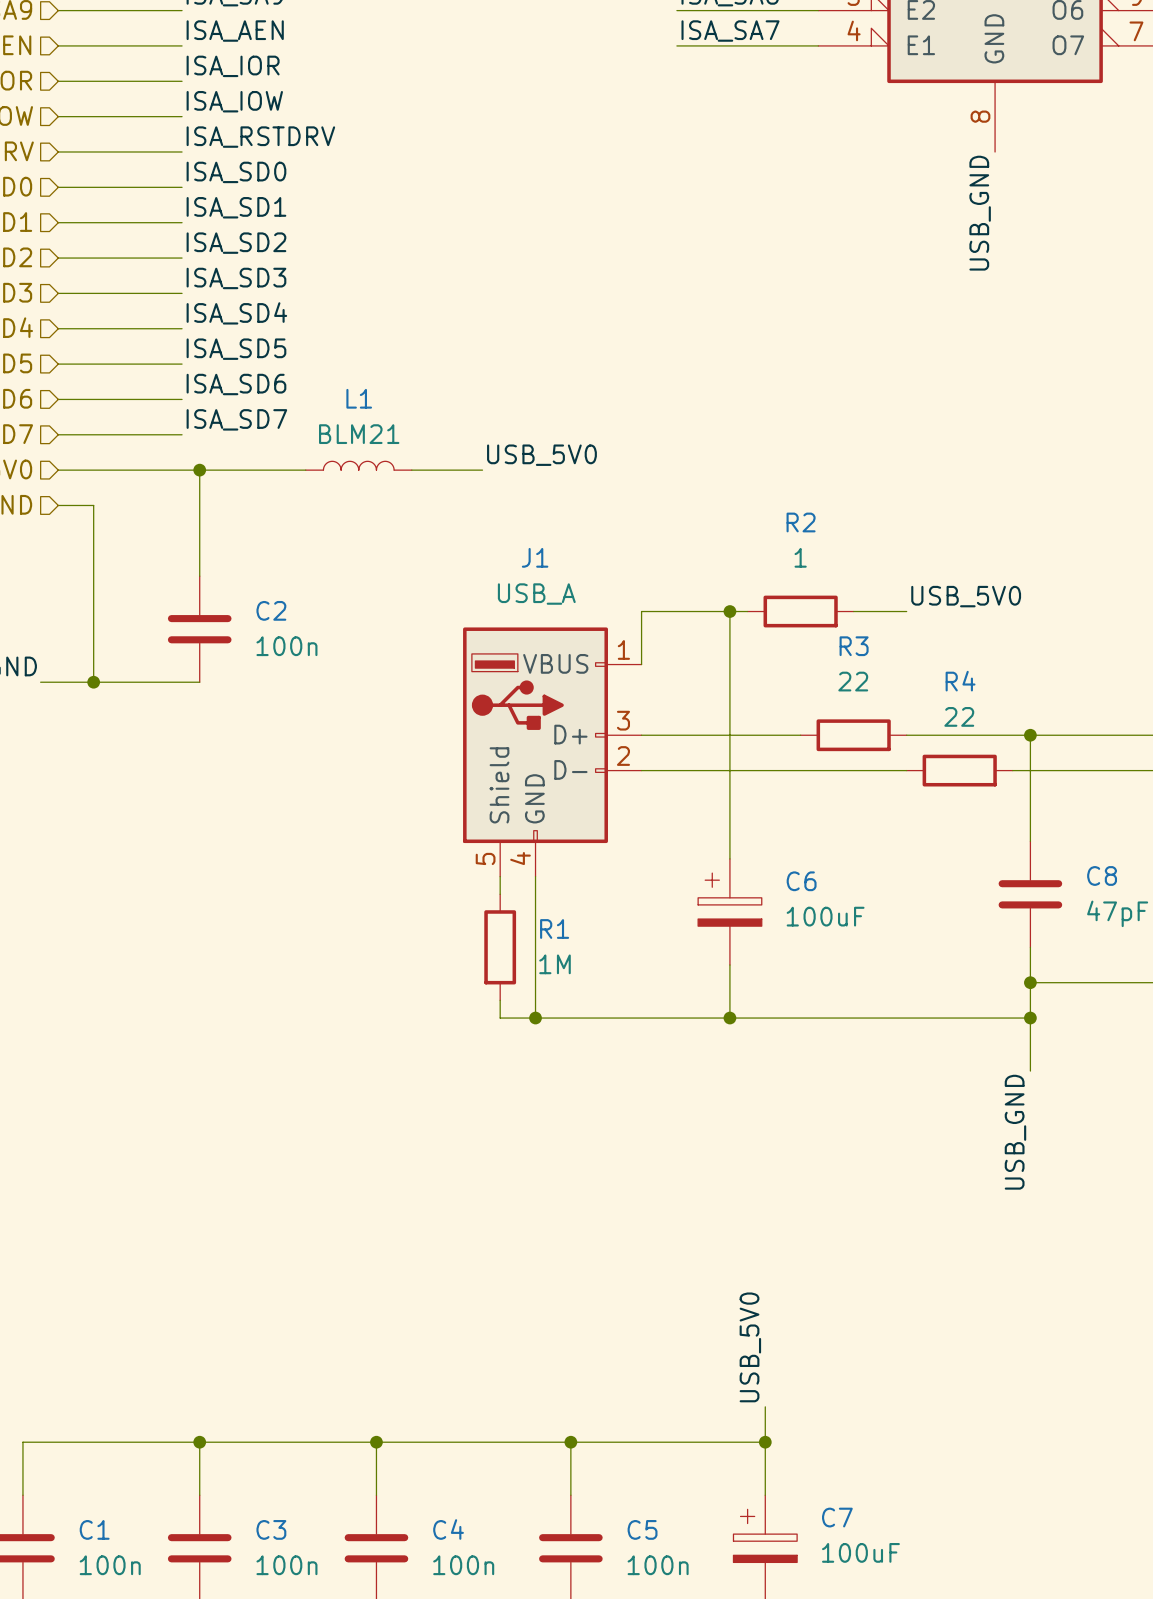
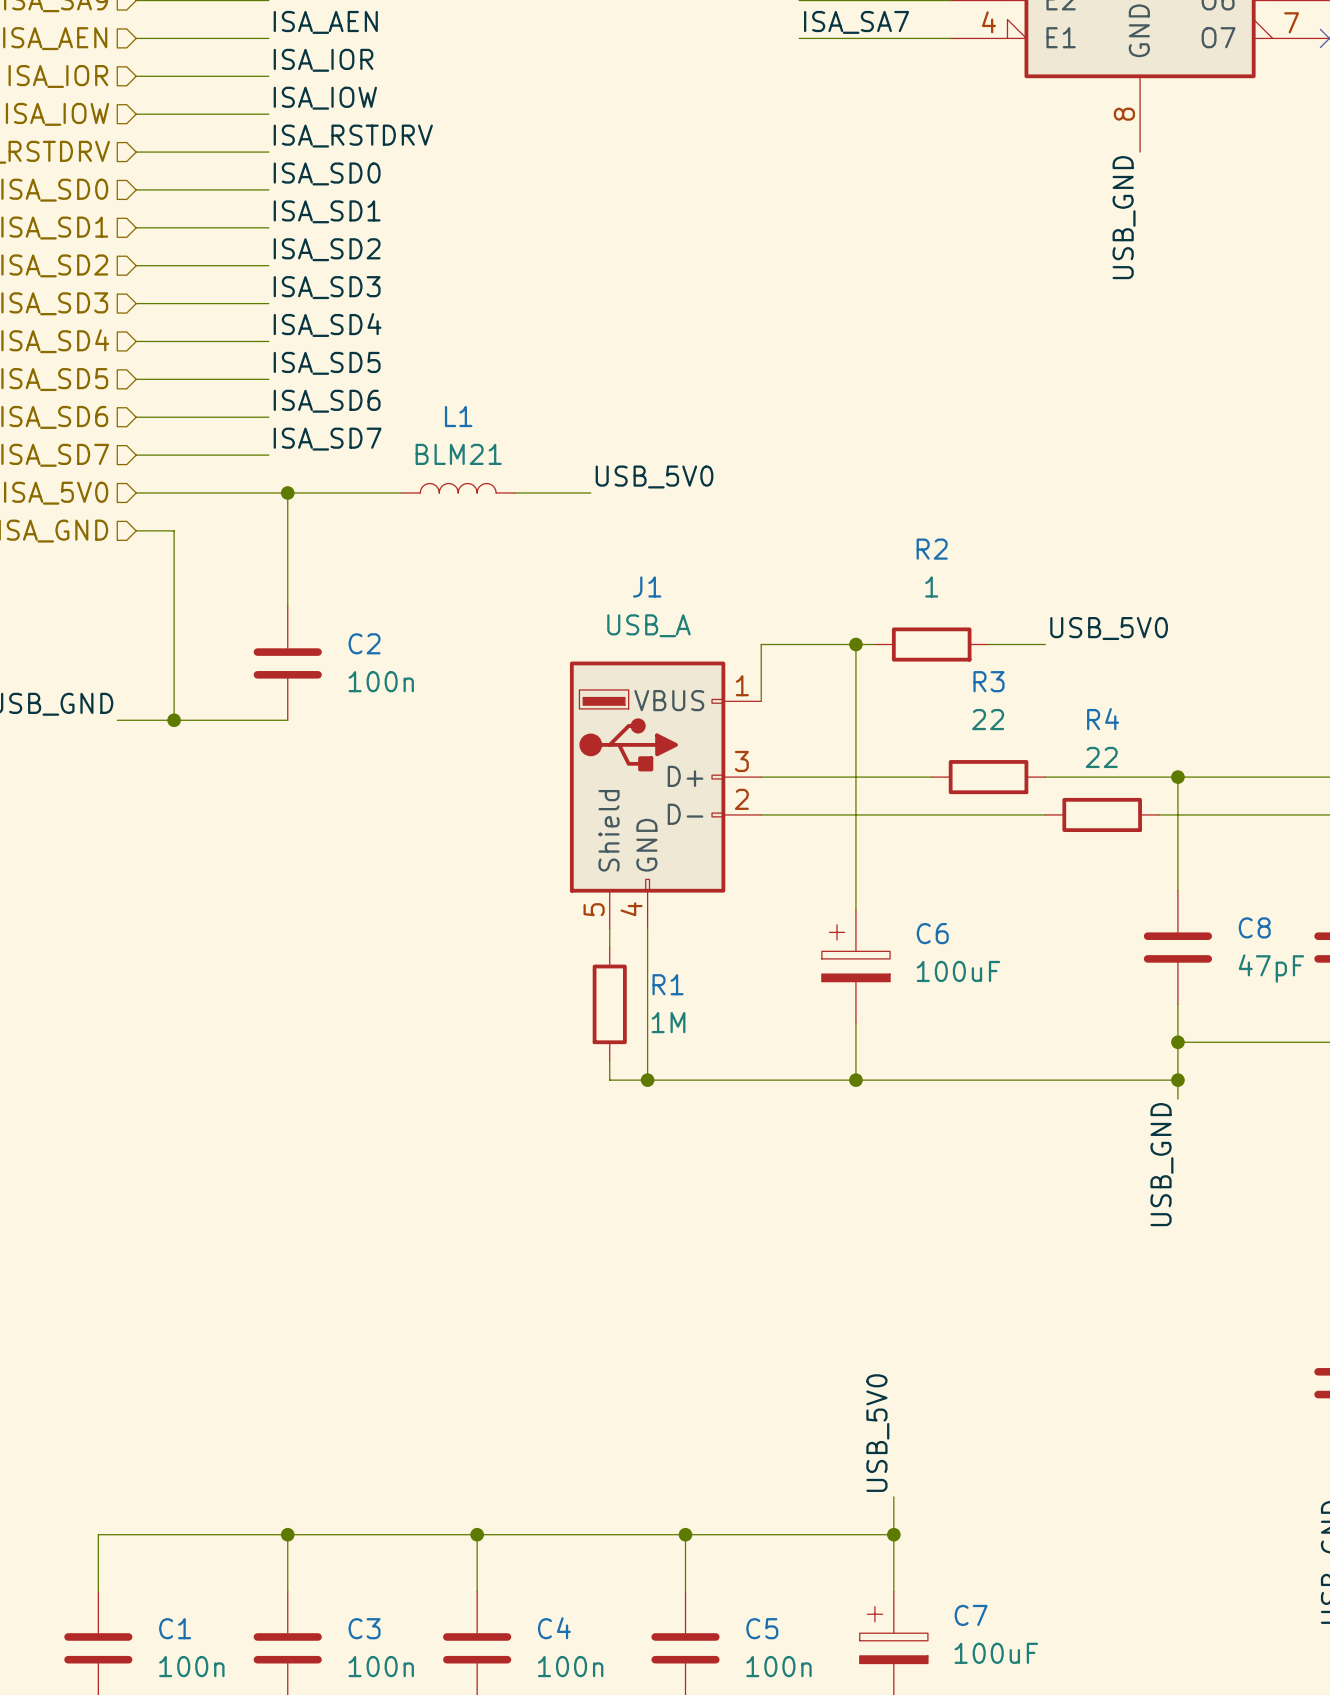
wire: (1030, 1035) (1030, 1071) -> none
label position: USB_GND (1015, 1132) -> USB_GND (1161, 1164)

